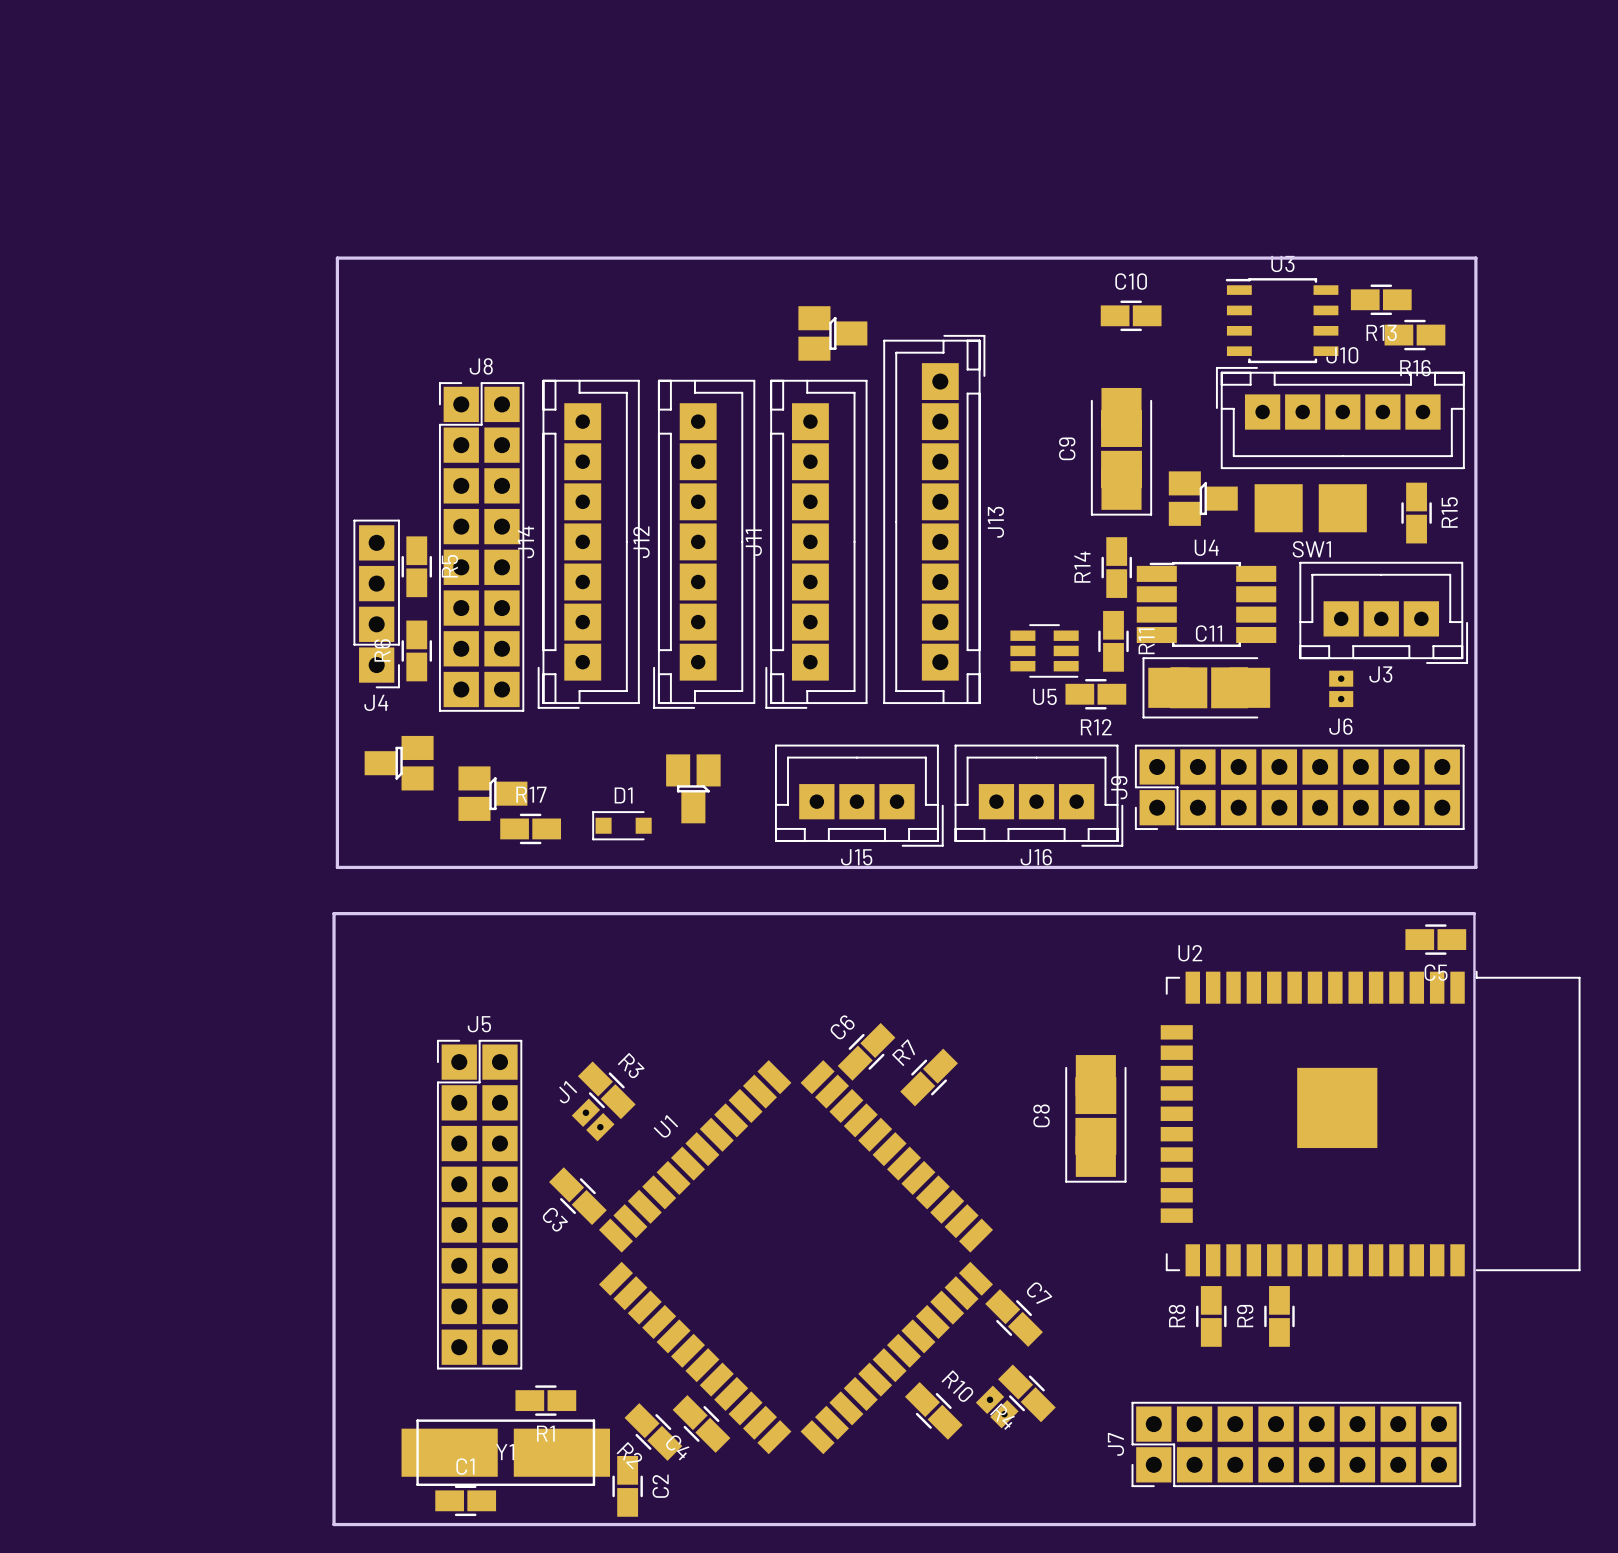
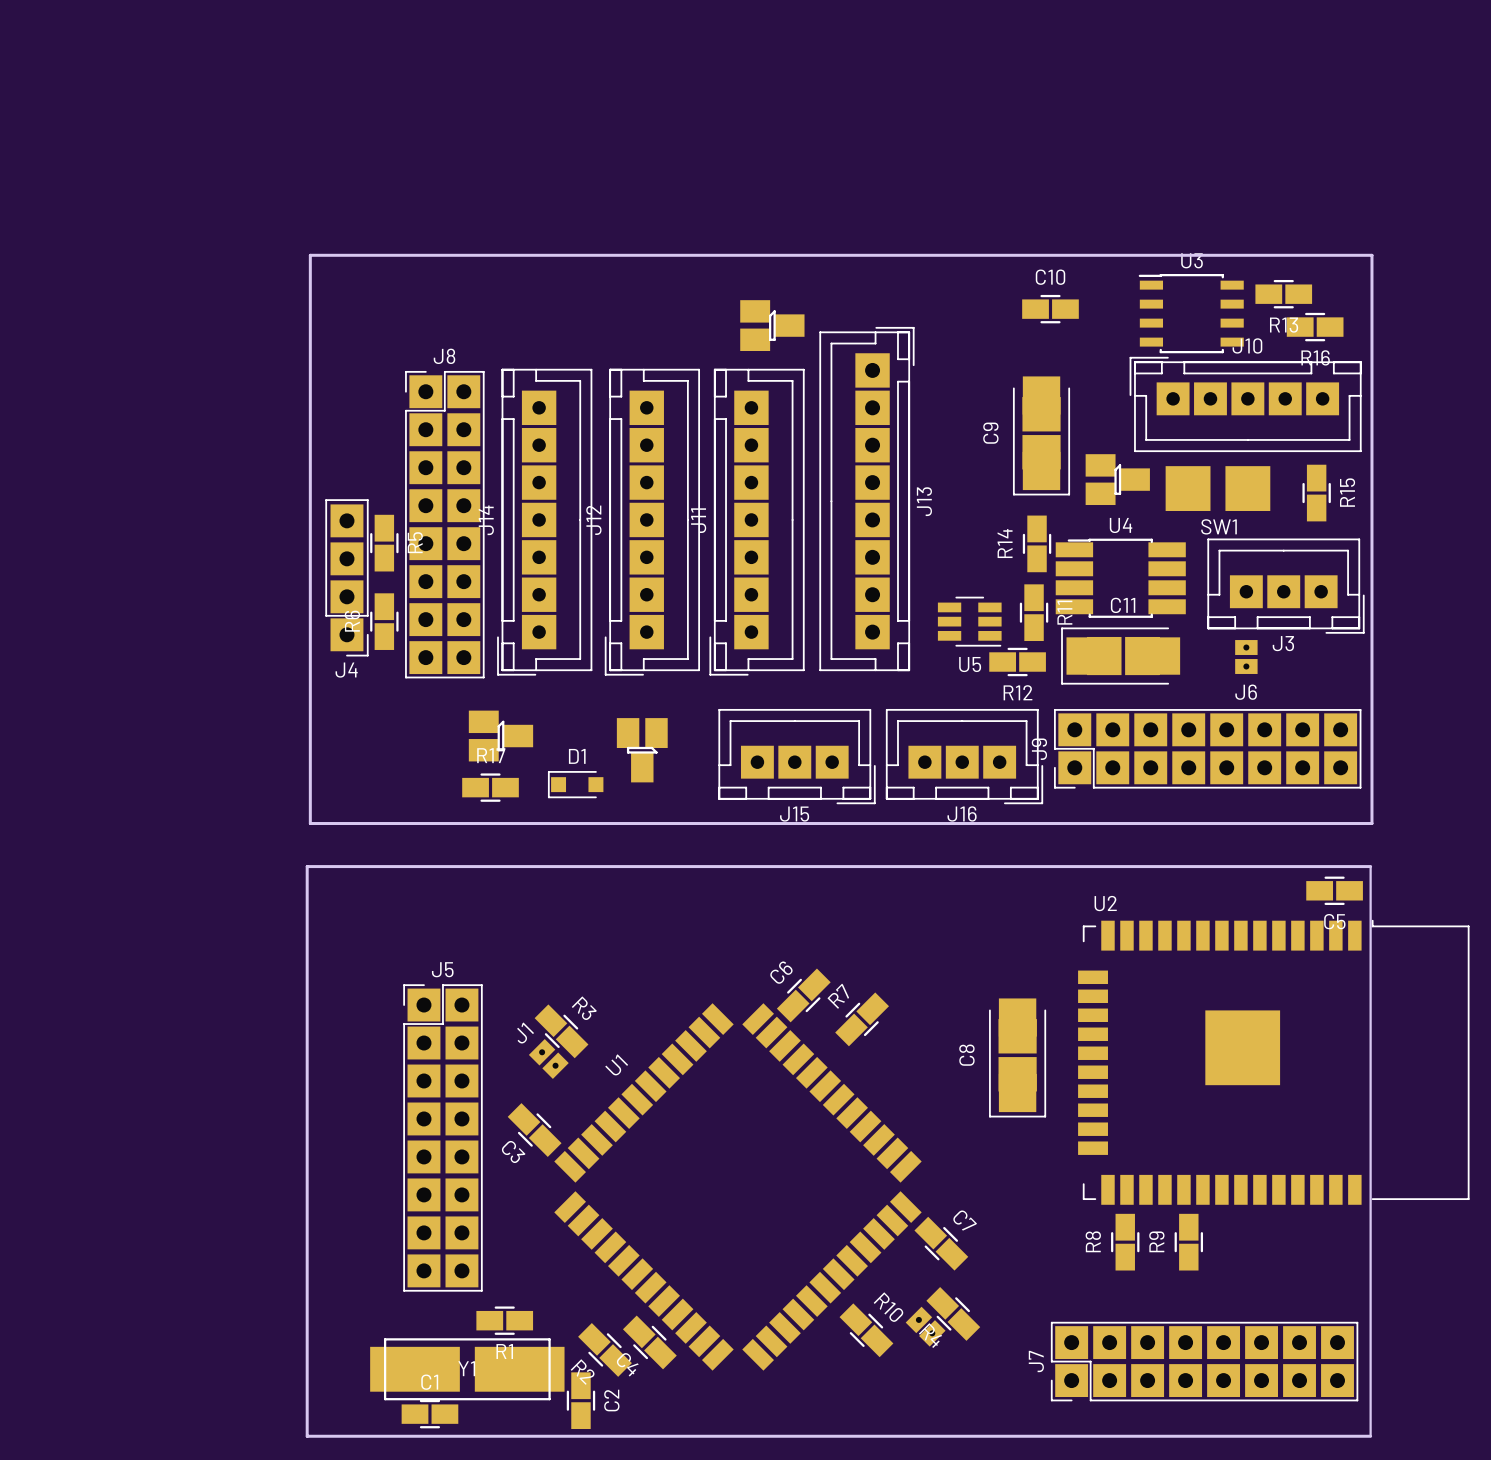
part: (399, 763) -> none
part position: (492, 793) -> (500, 736)

